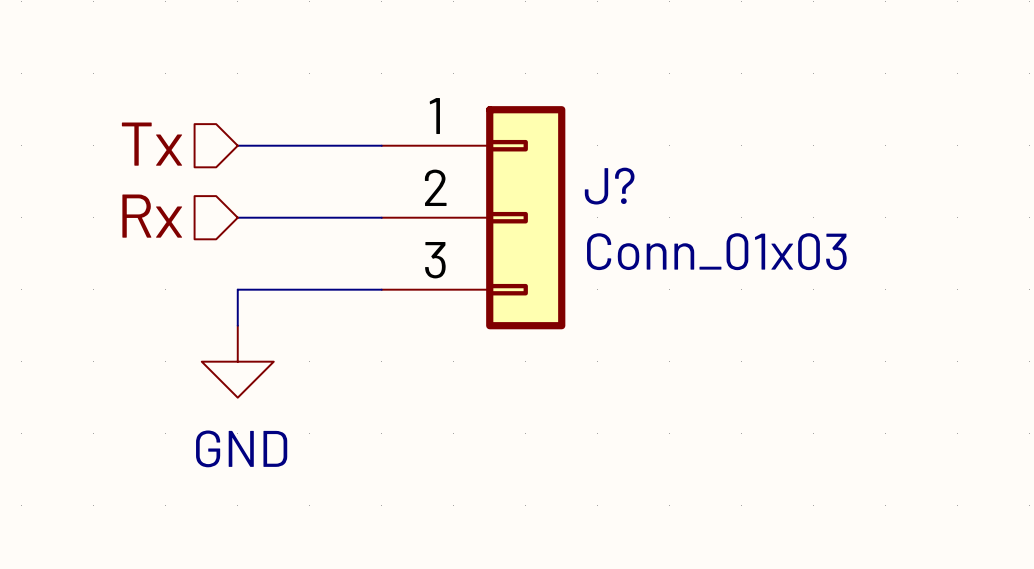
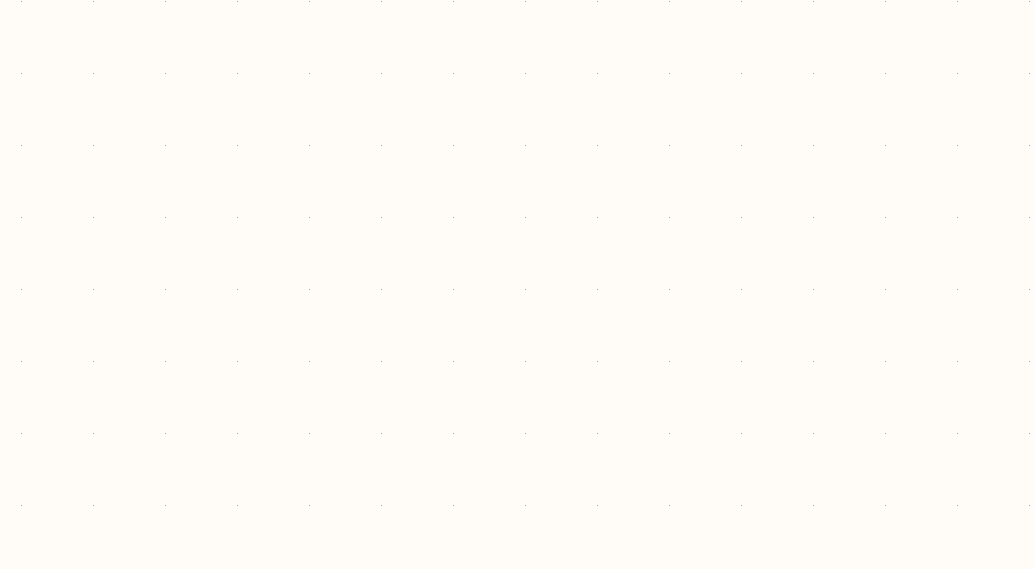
hierarchical label: Tx (152, 144) -> none
wire: (237, 145) (381, 145) -> none
hierarchical label: Rx (152, 216) -> none
wire: (237, 217) (381, 217) -> none
J?: Conn_01x03 (473, 217) -> none
wire: (381, 289) (237, 289) (237, 325) -> none
power symbol: GND (237, 361) -> none

